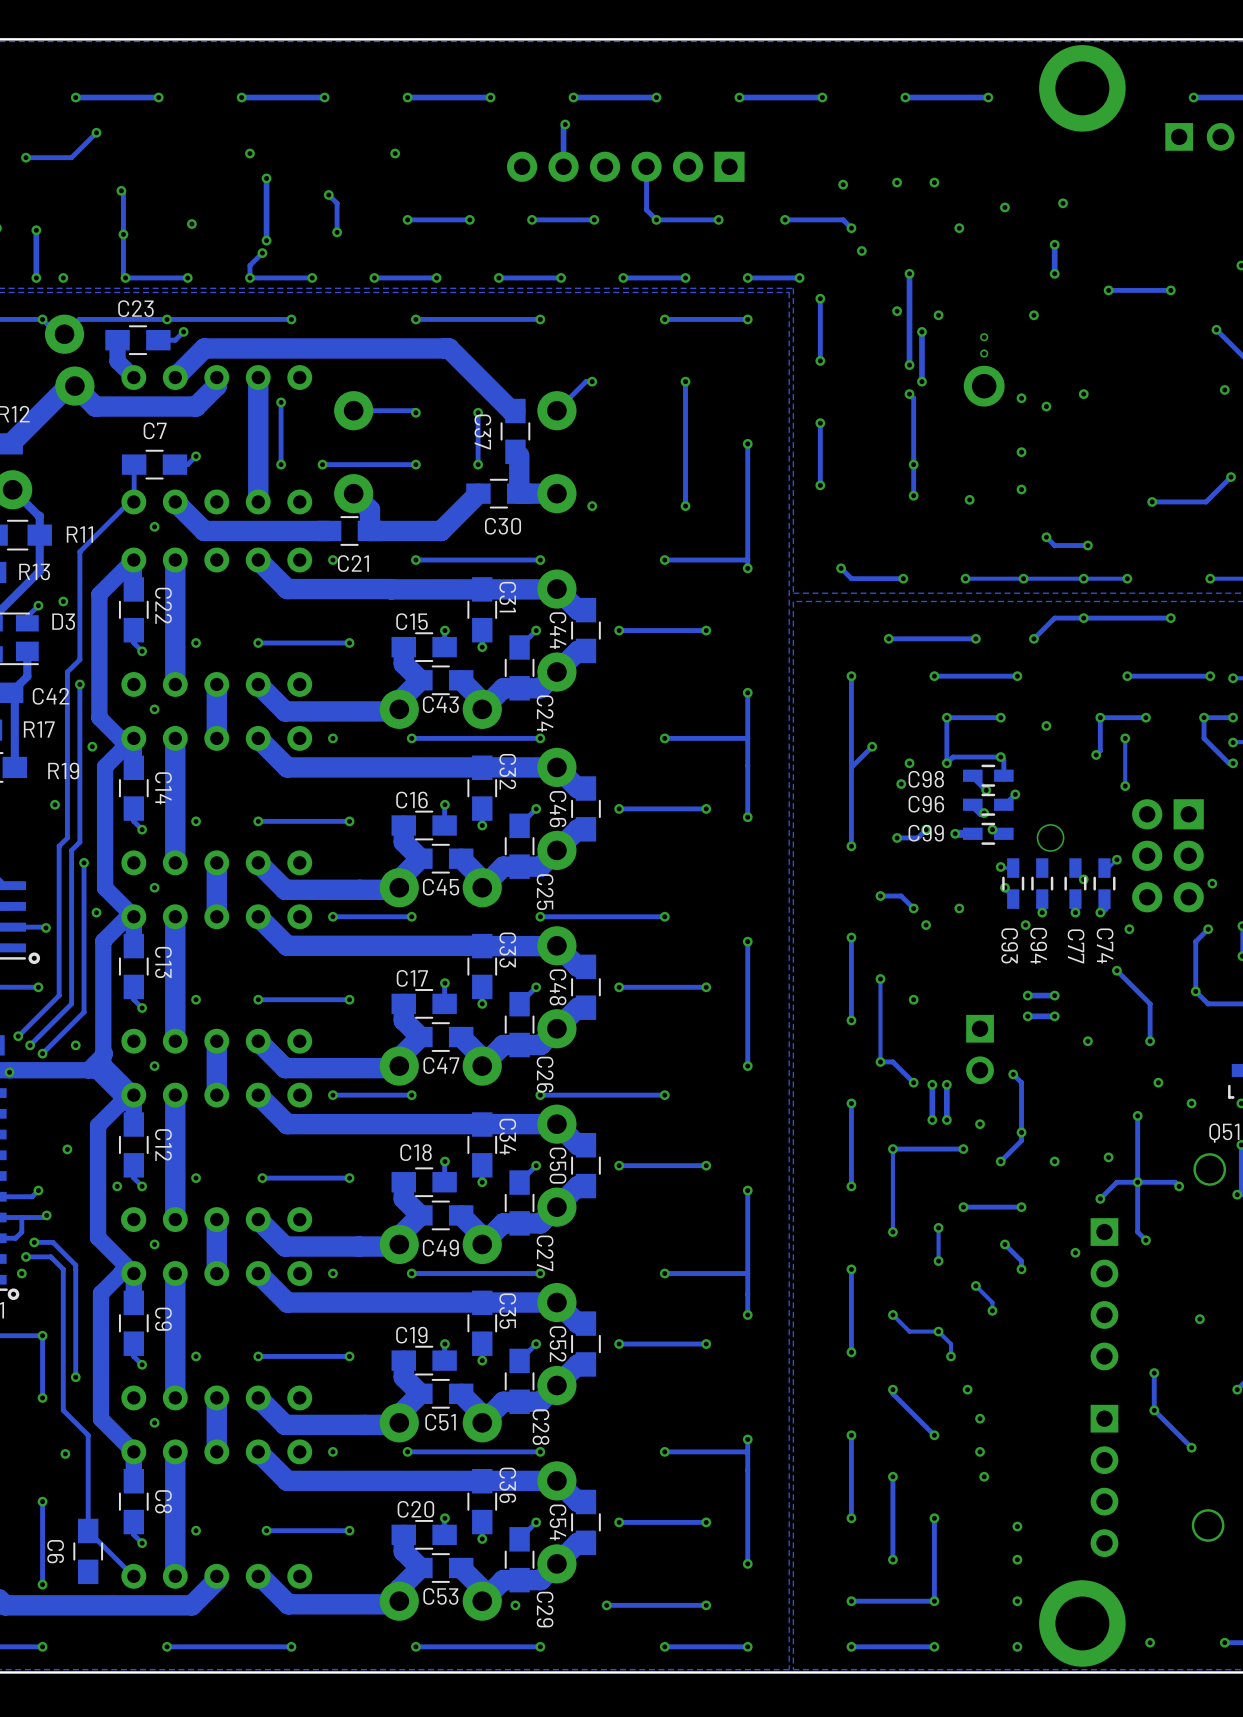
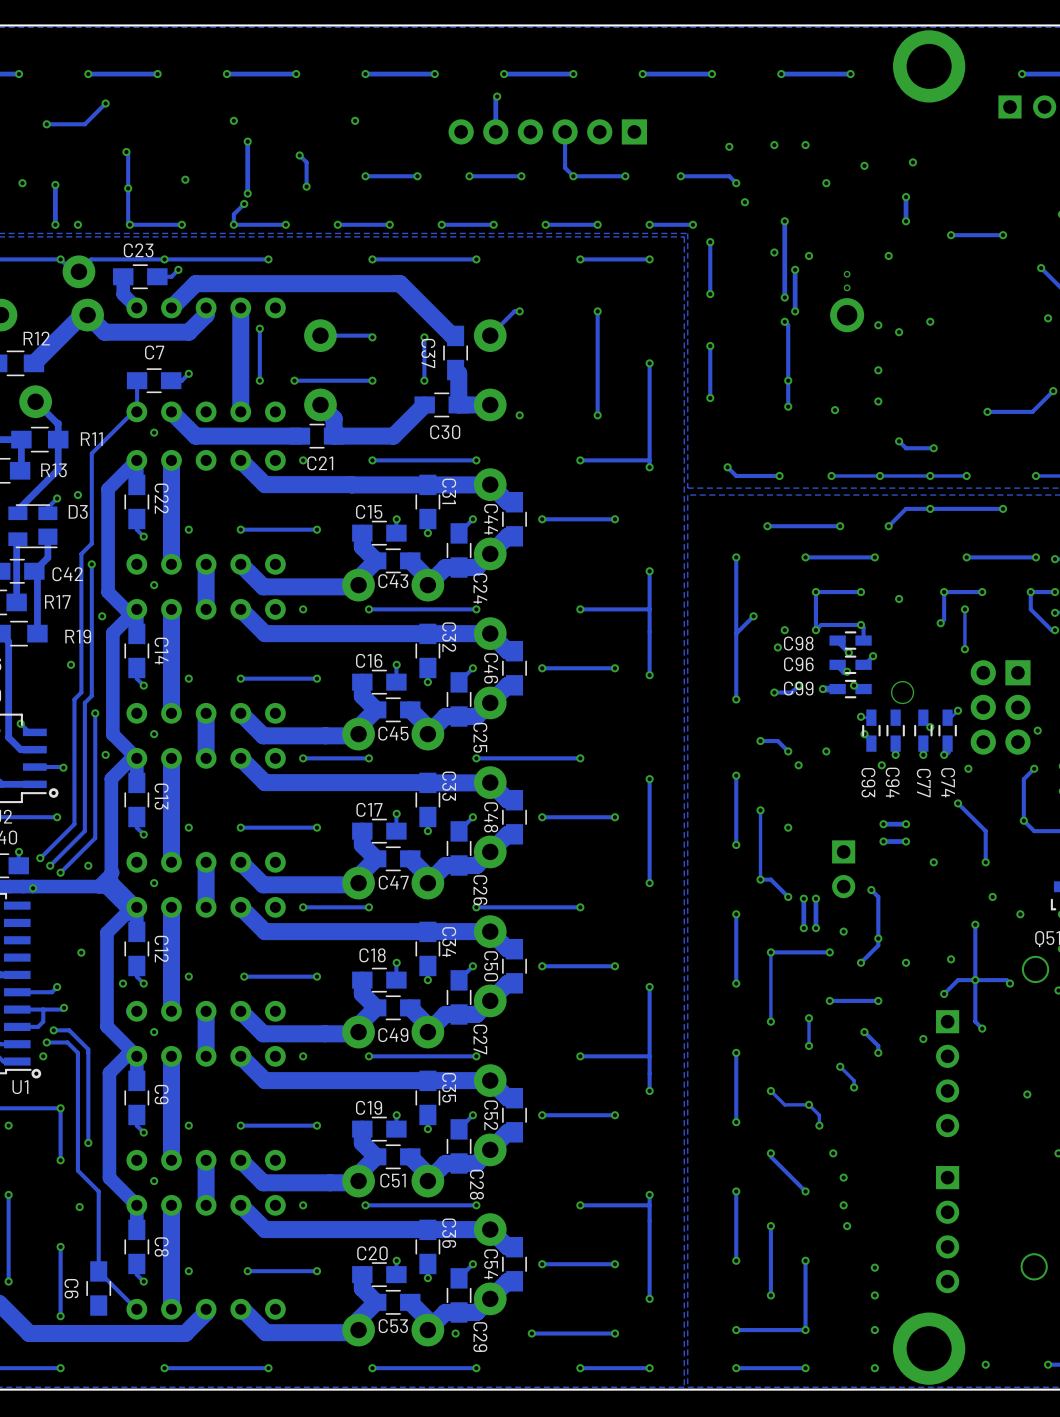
track: (1154, 1373) (1154, 1410) (1191, 1447) -> none
via: (1154, 1373) -> none
via: (1154, 1410) -> none
via: (1191, 1447) -> none

